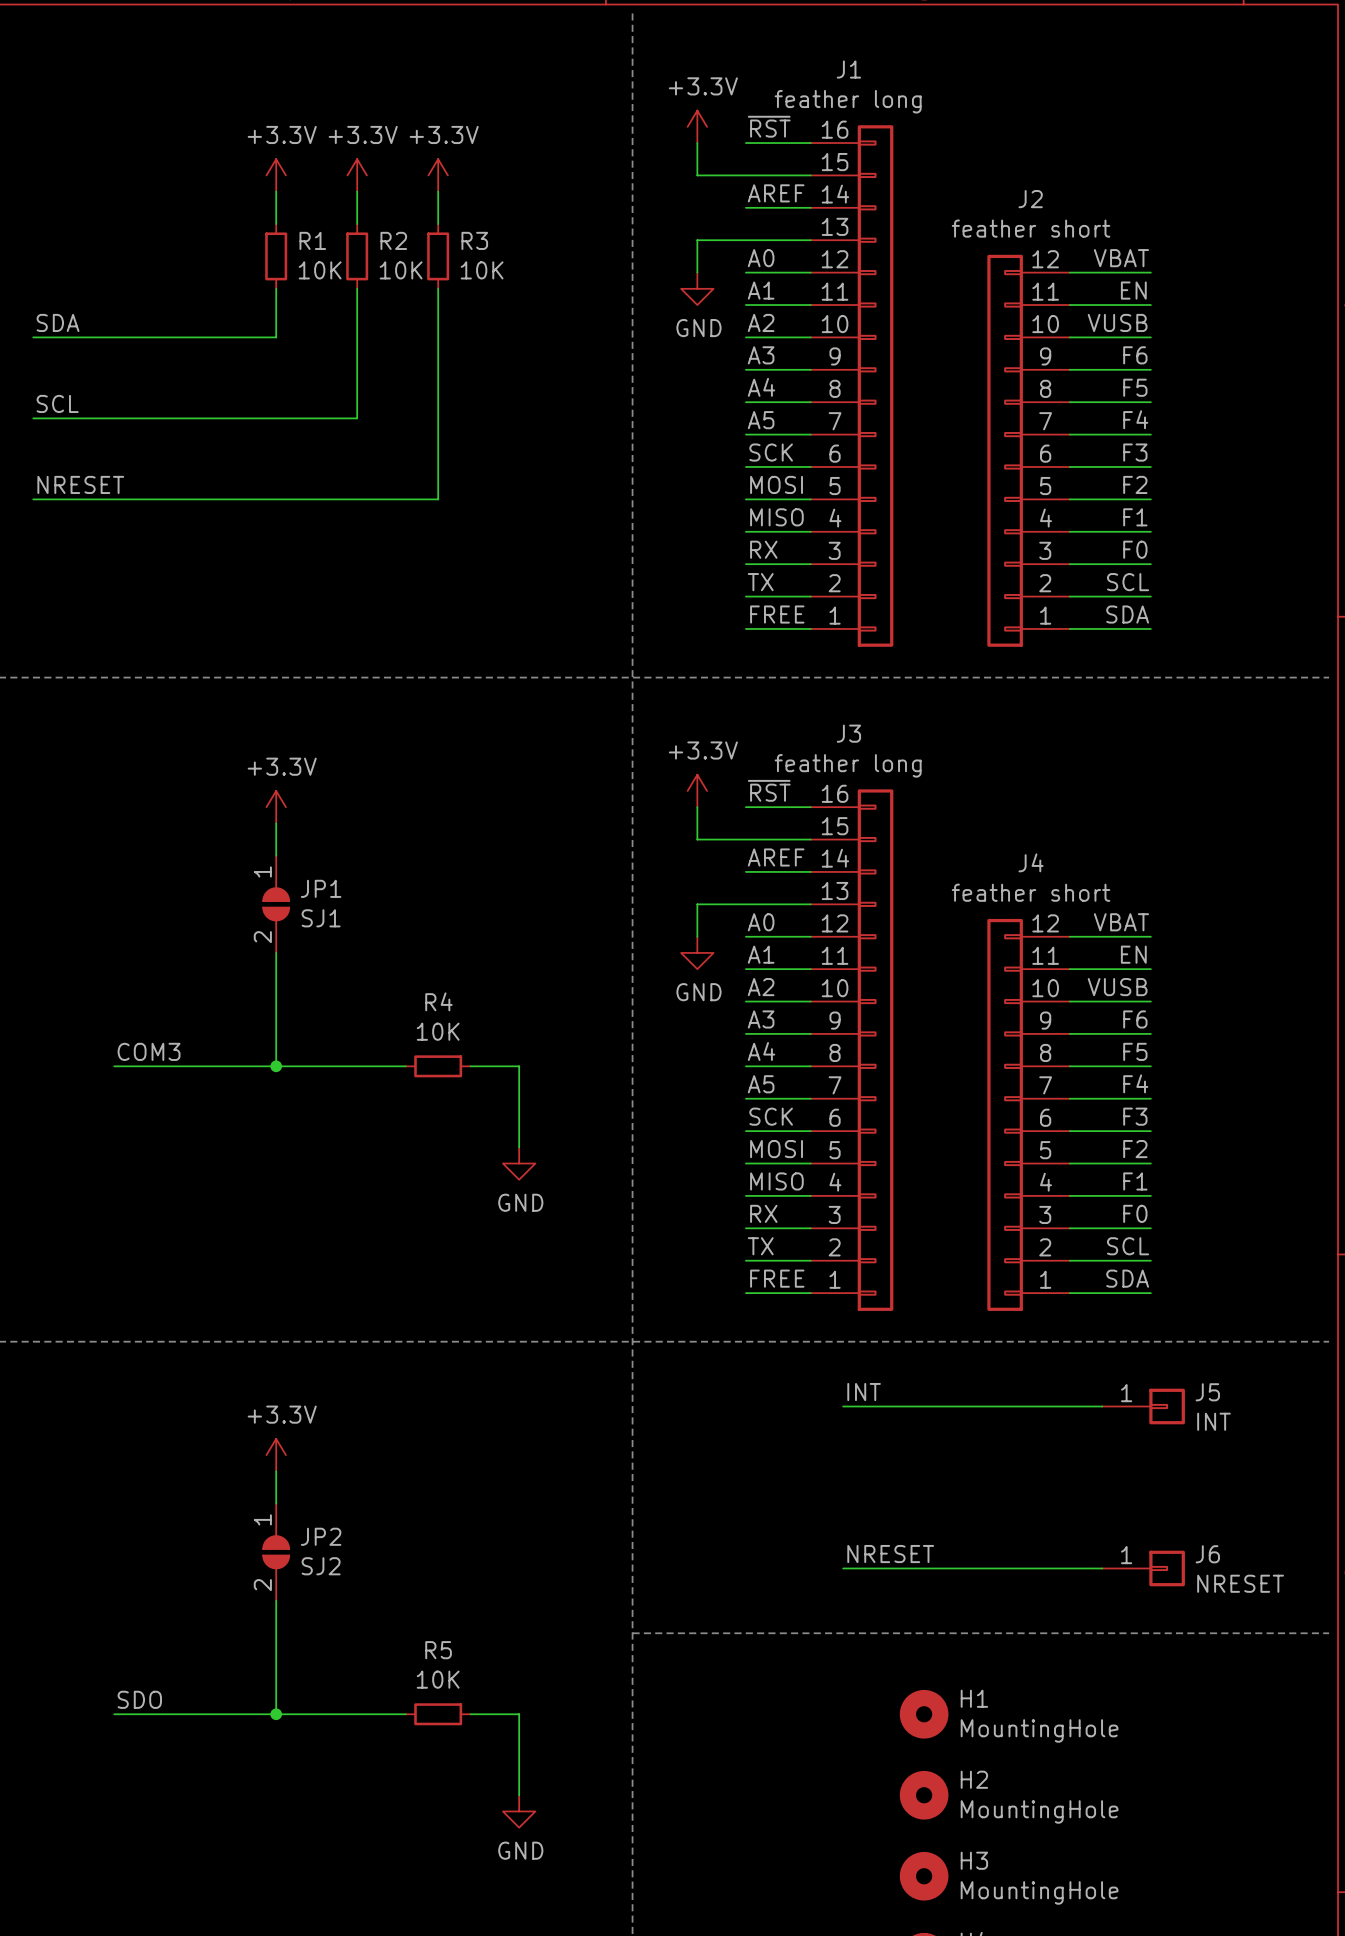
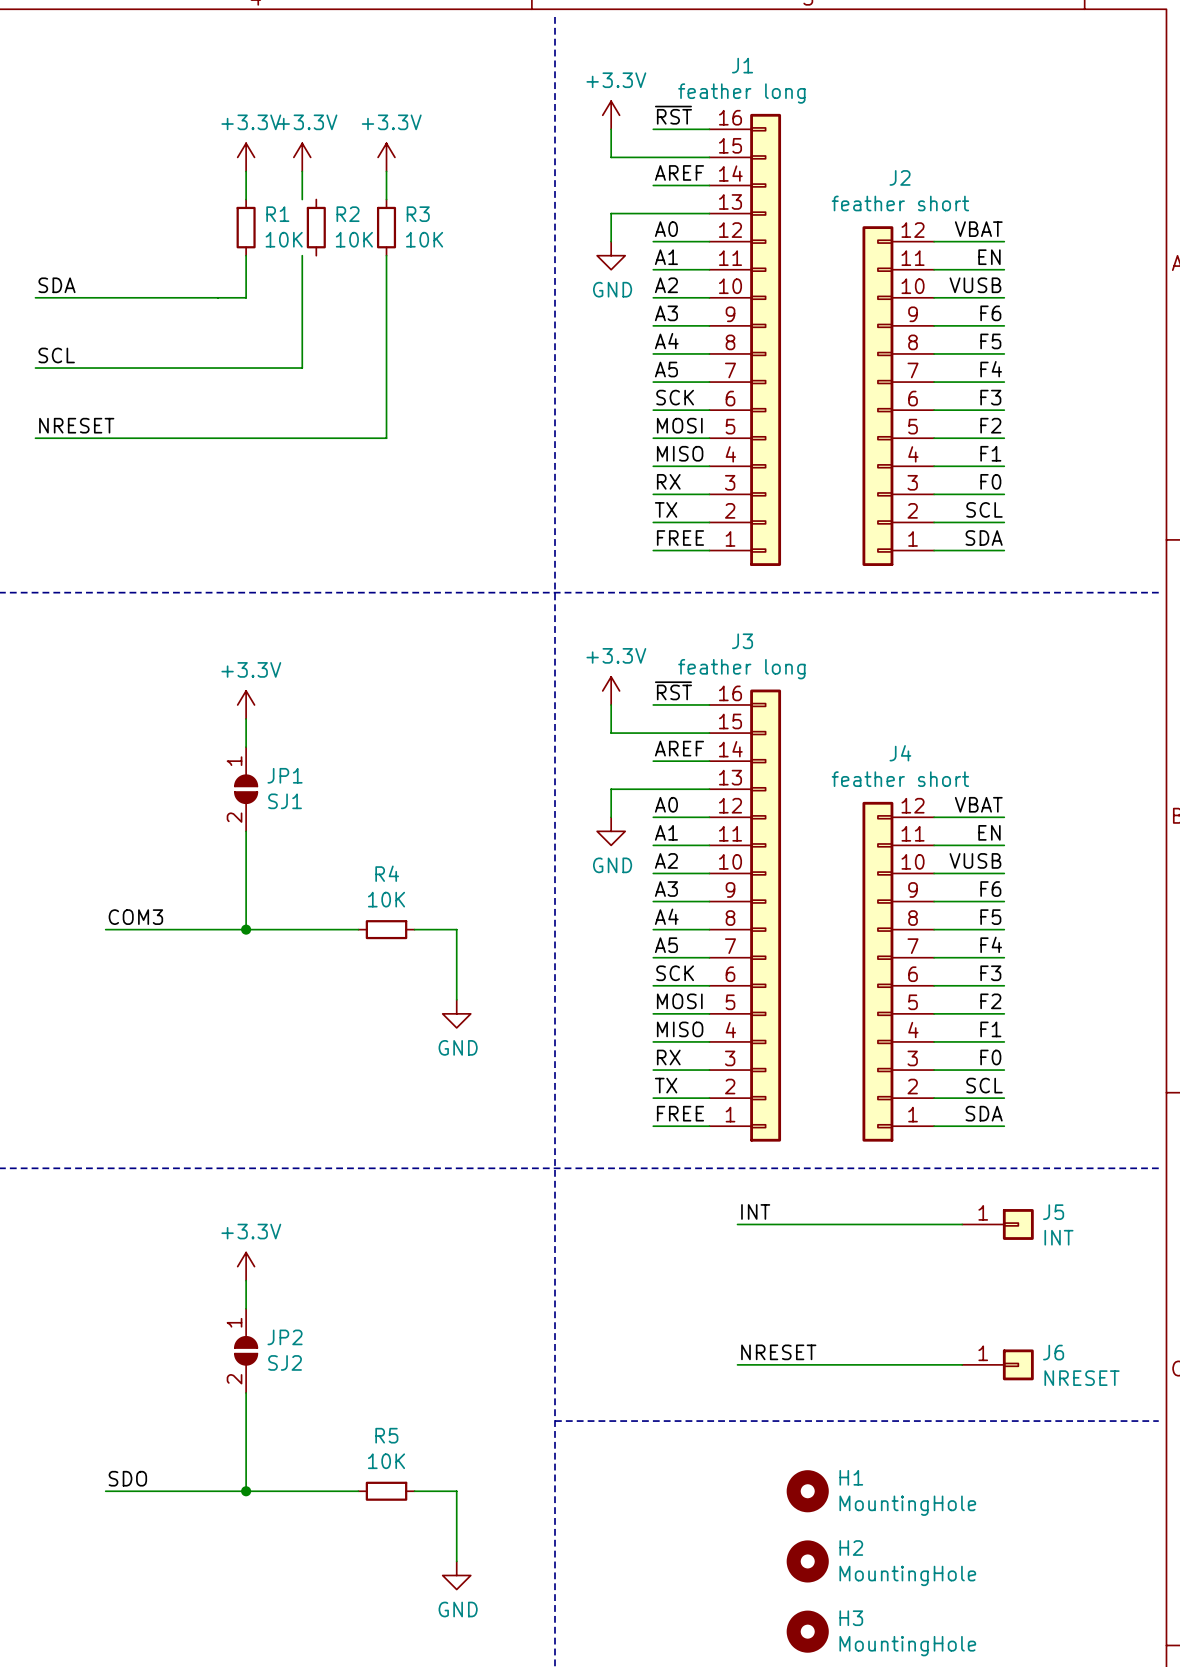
power symbol position: +3.3V (357, 175) -> +3.3V (302, 157)
wire: (357, 191) (357, 224) -> (302, 171) (302, 199)
wire: (357, 288) (357, 418) (340, 418) -> (302, 255) (302, 368)

